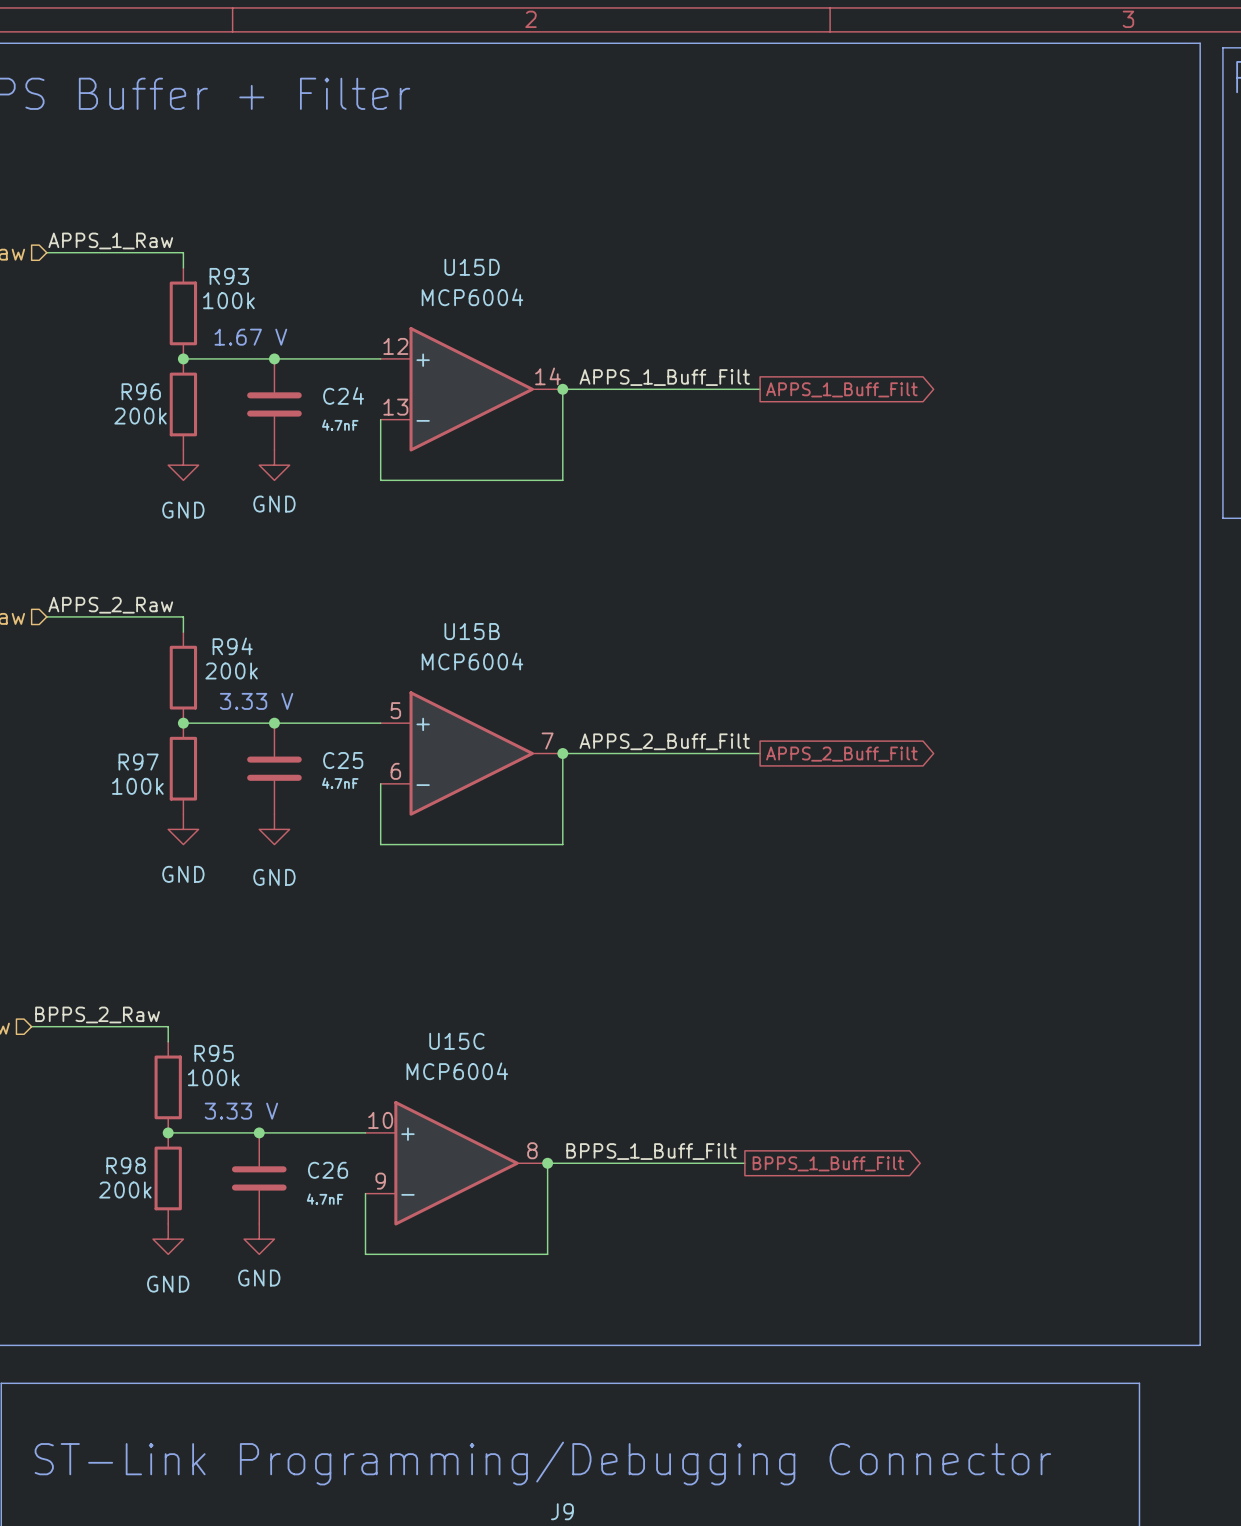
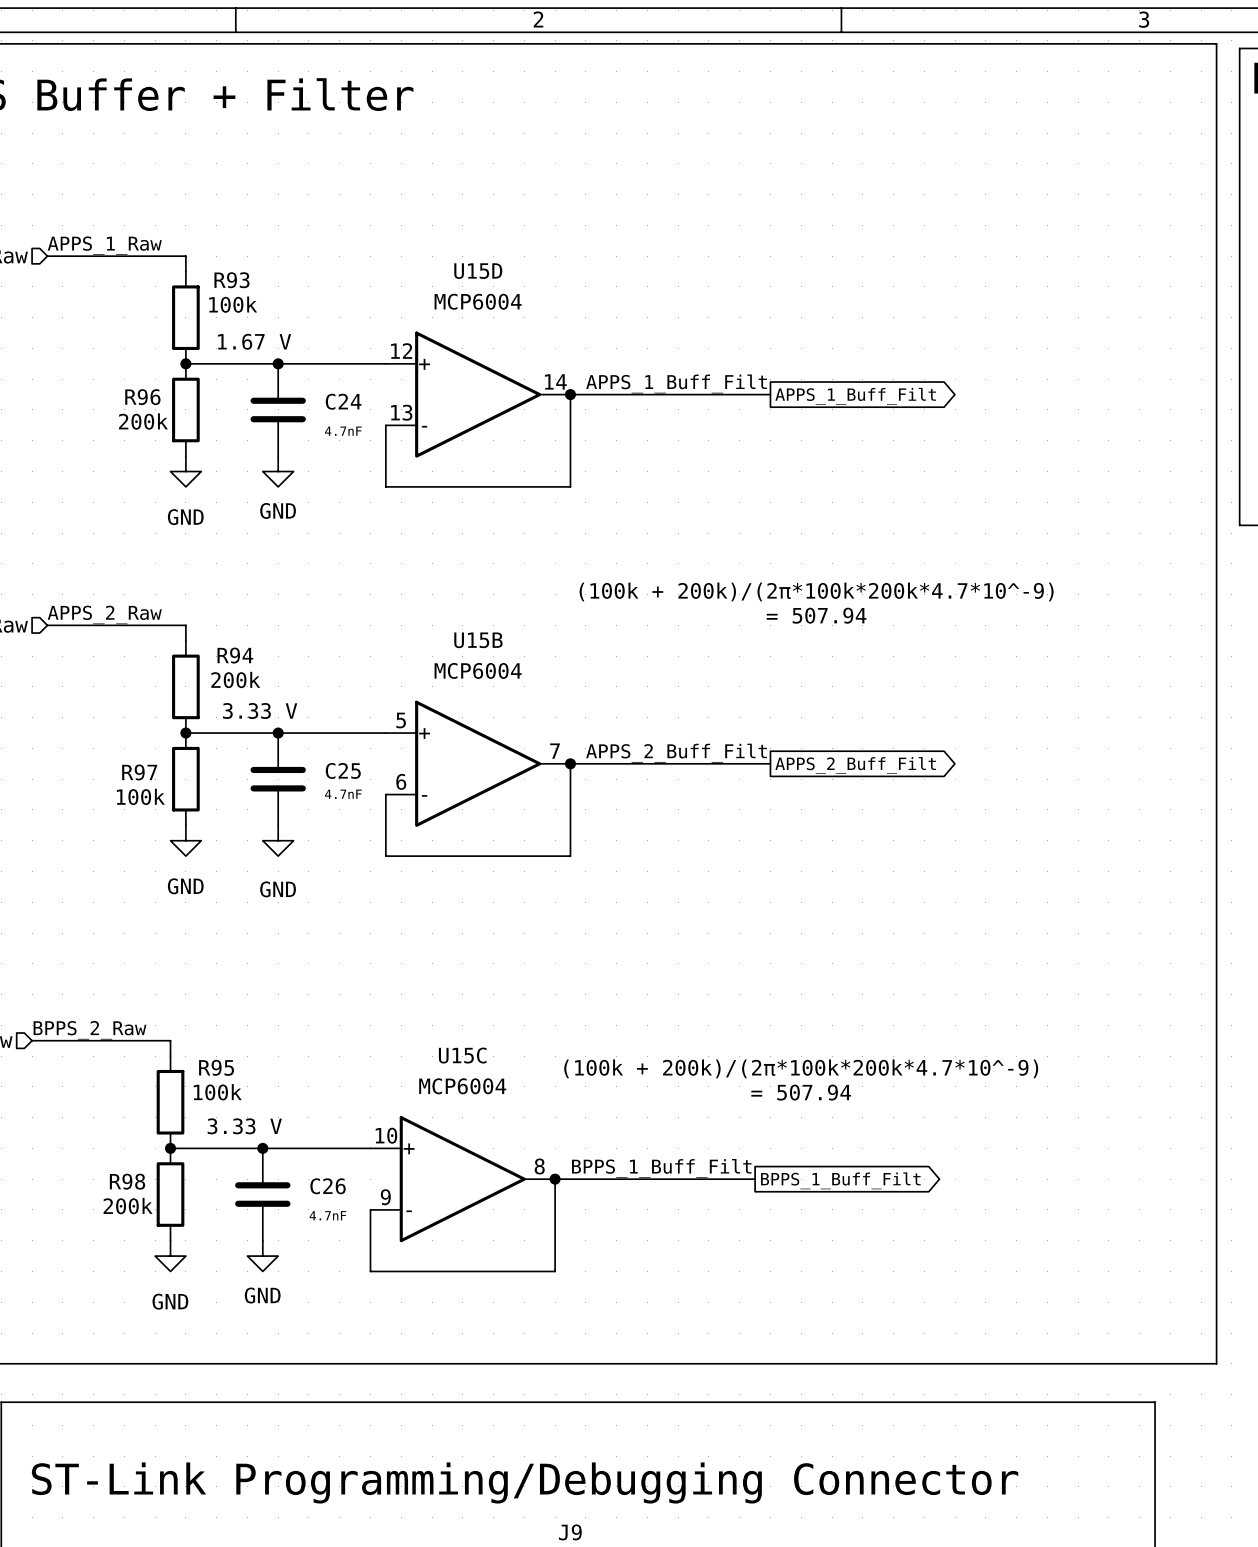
text: none -> (100k + 200k)/(2π*100k*200k*4.7*10^-9) (816, 591)
text: none -> = 507.94 (816, 615)
text: none -> (100k + 200k)/(2π*100k*200k*4.7*10^-9) (801, 1068)
text: none -> = 507.94 (801, 1092)

